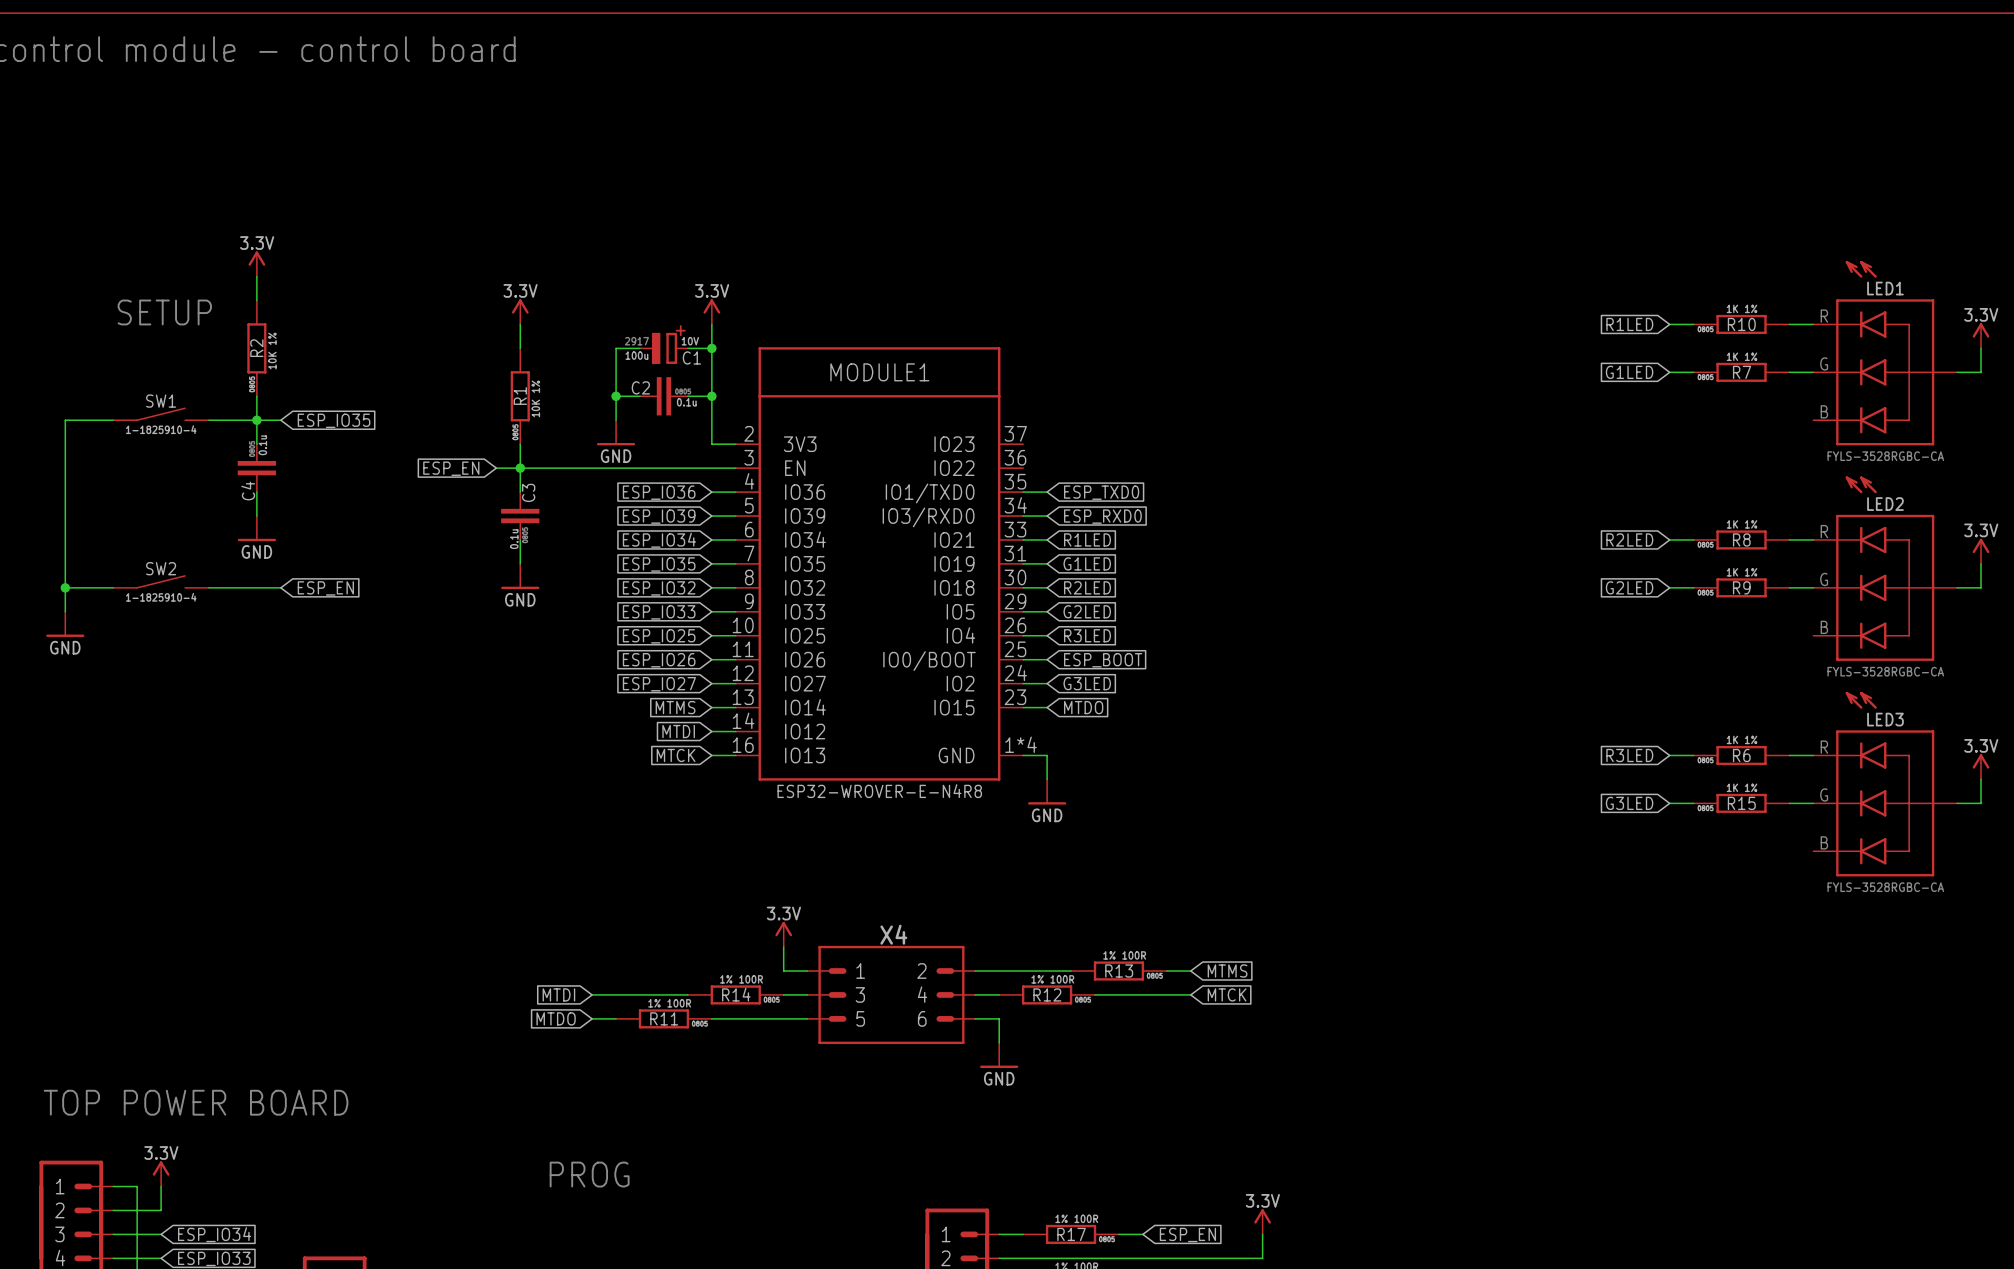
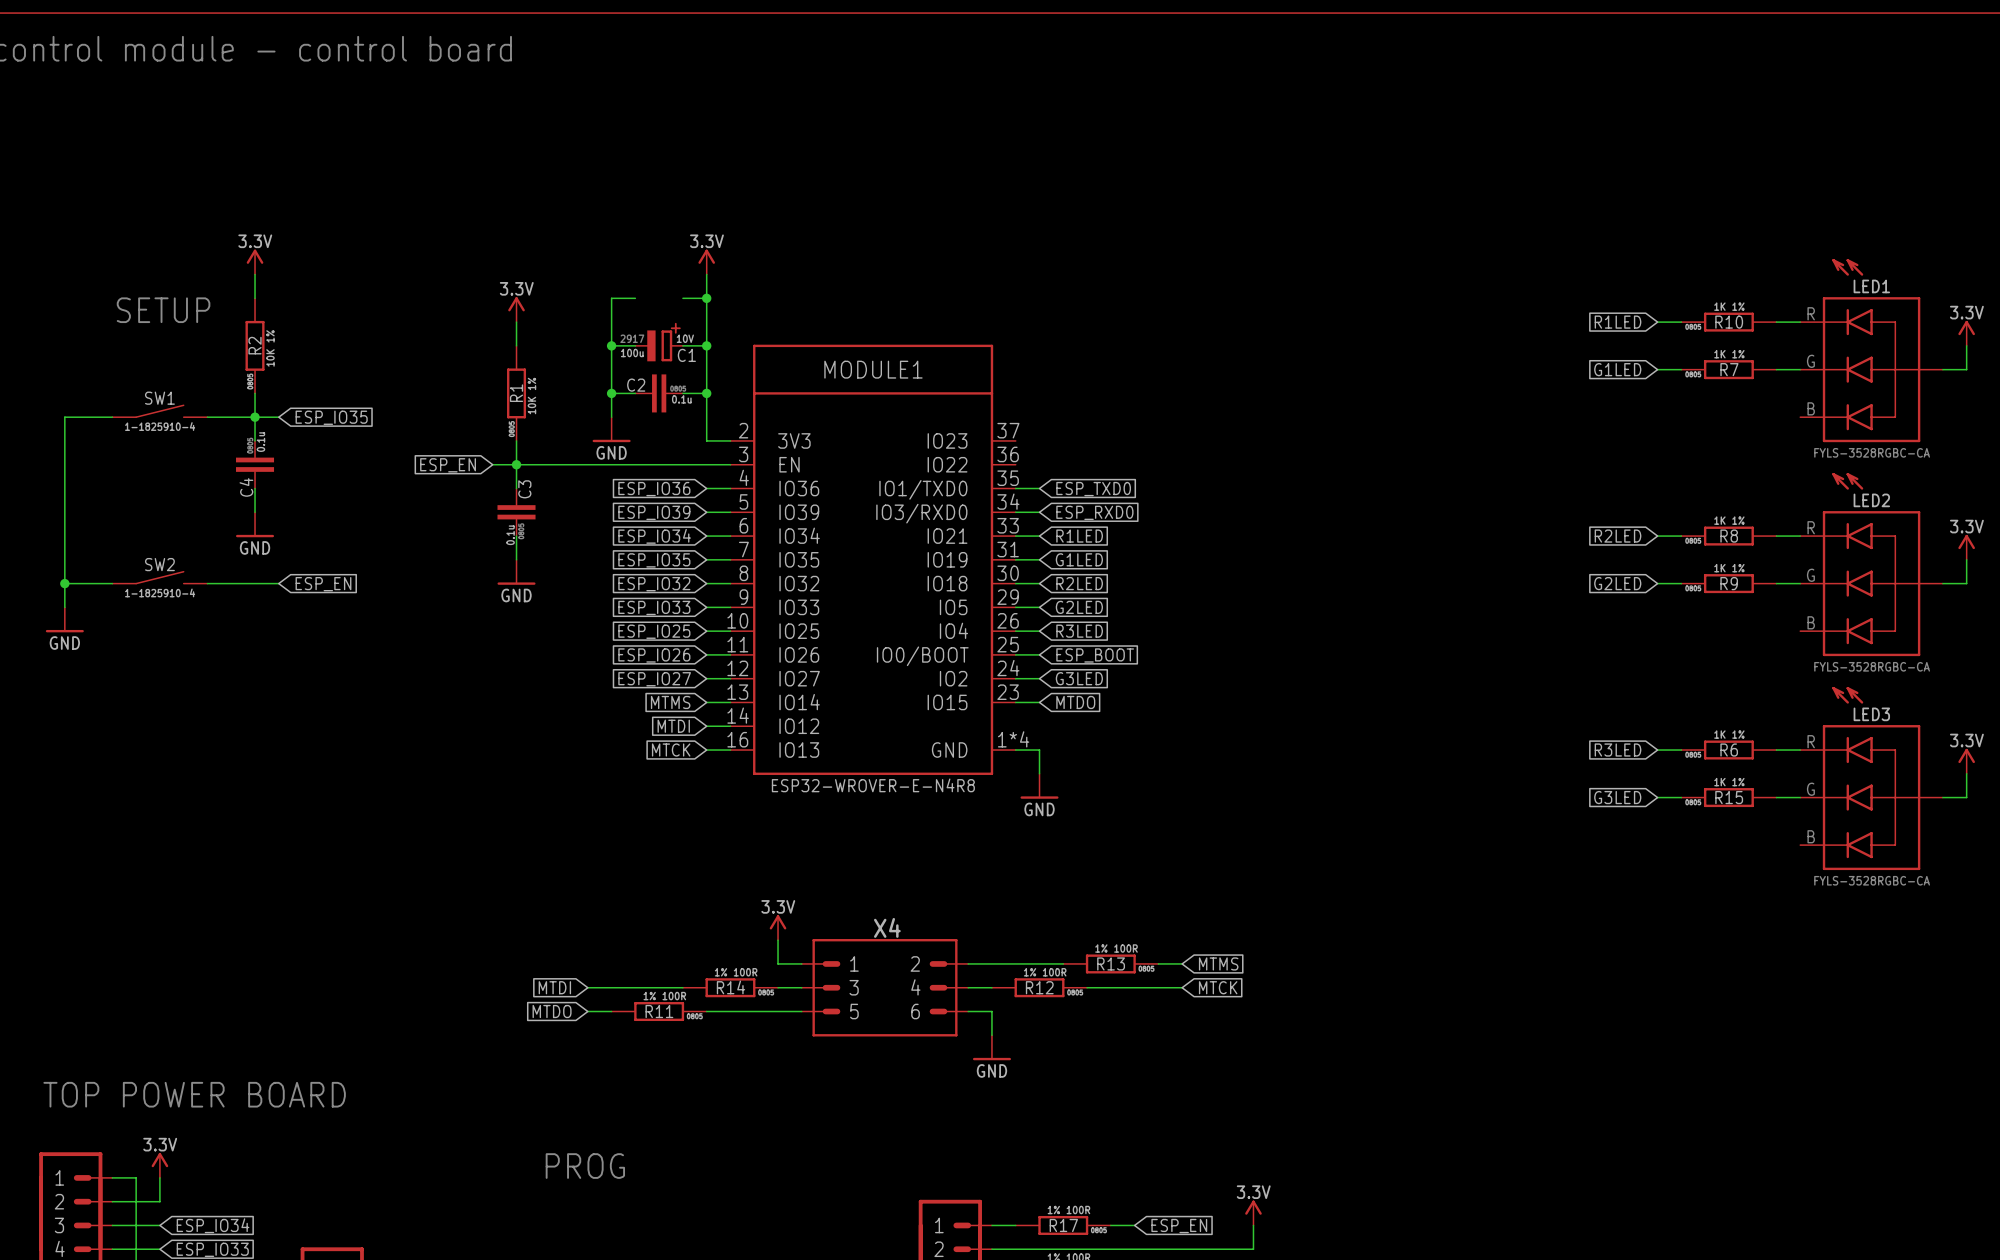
wire: none -> (635, 298) (611, 298) (611, 345)
wire: none -> (682, 298) (706, 298)
junction: none -> (706, 298)
power symbol position: 3.3V (711, 311) -> 3.3V (706, 262)
junction: none -> (611, 345)

